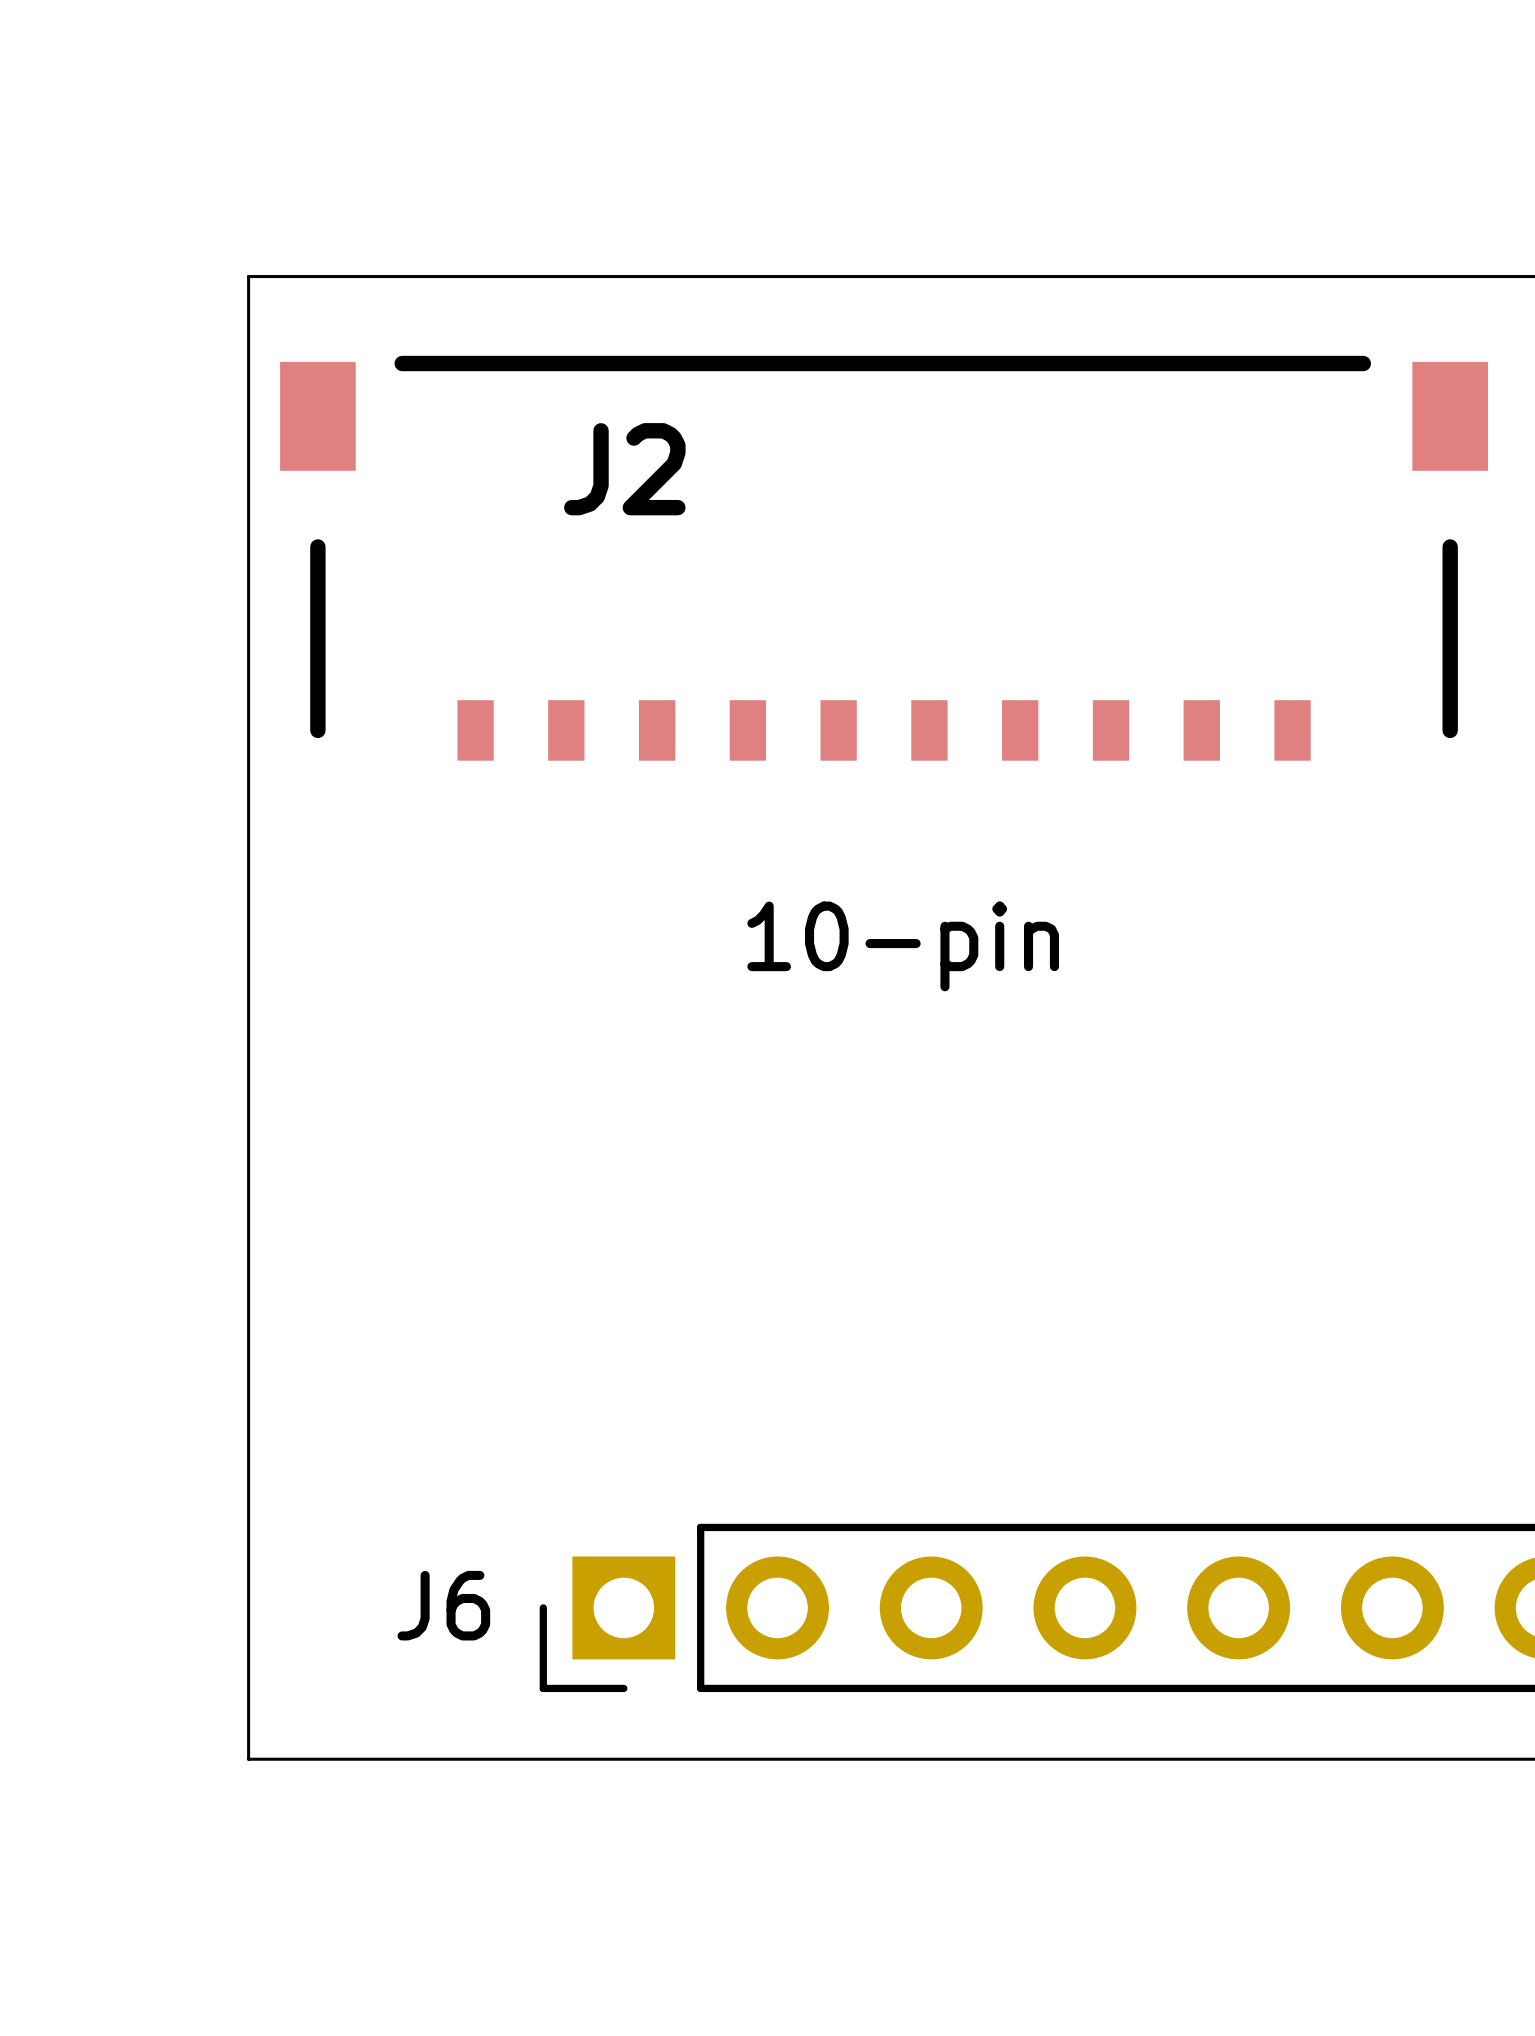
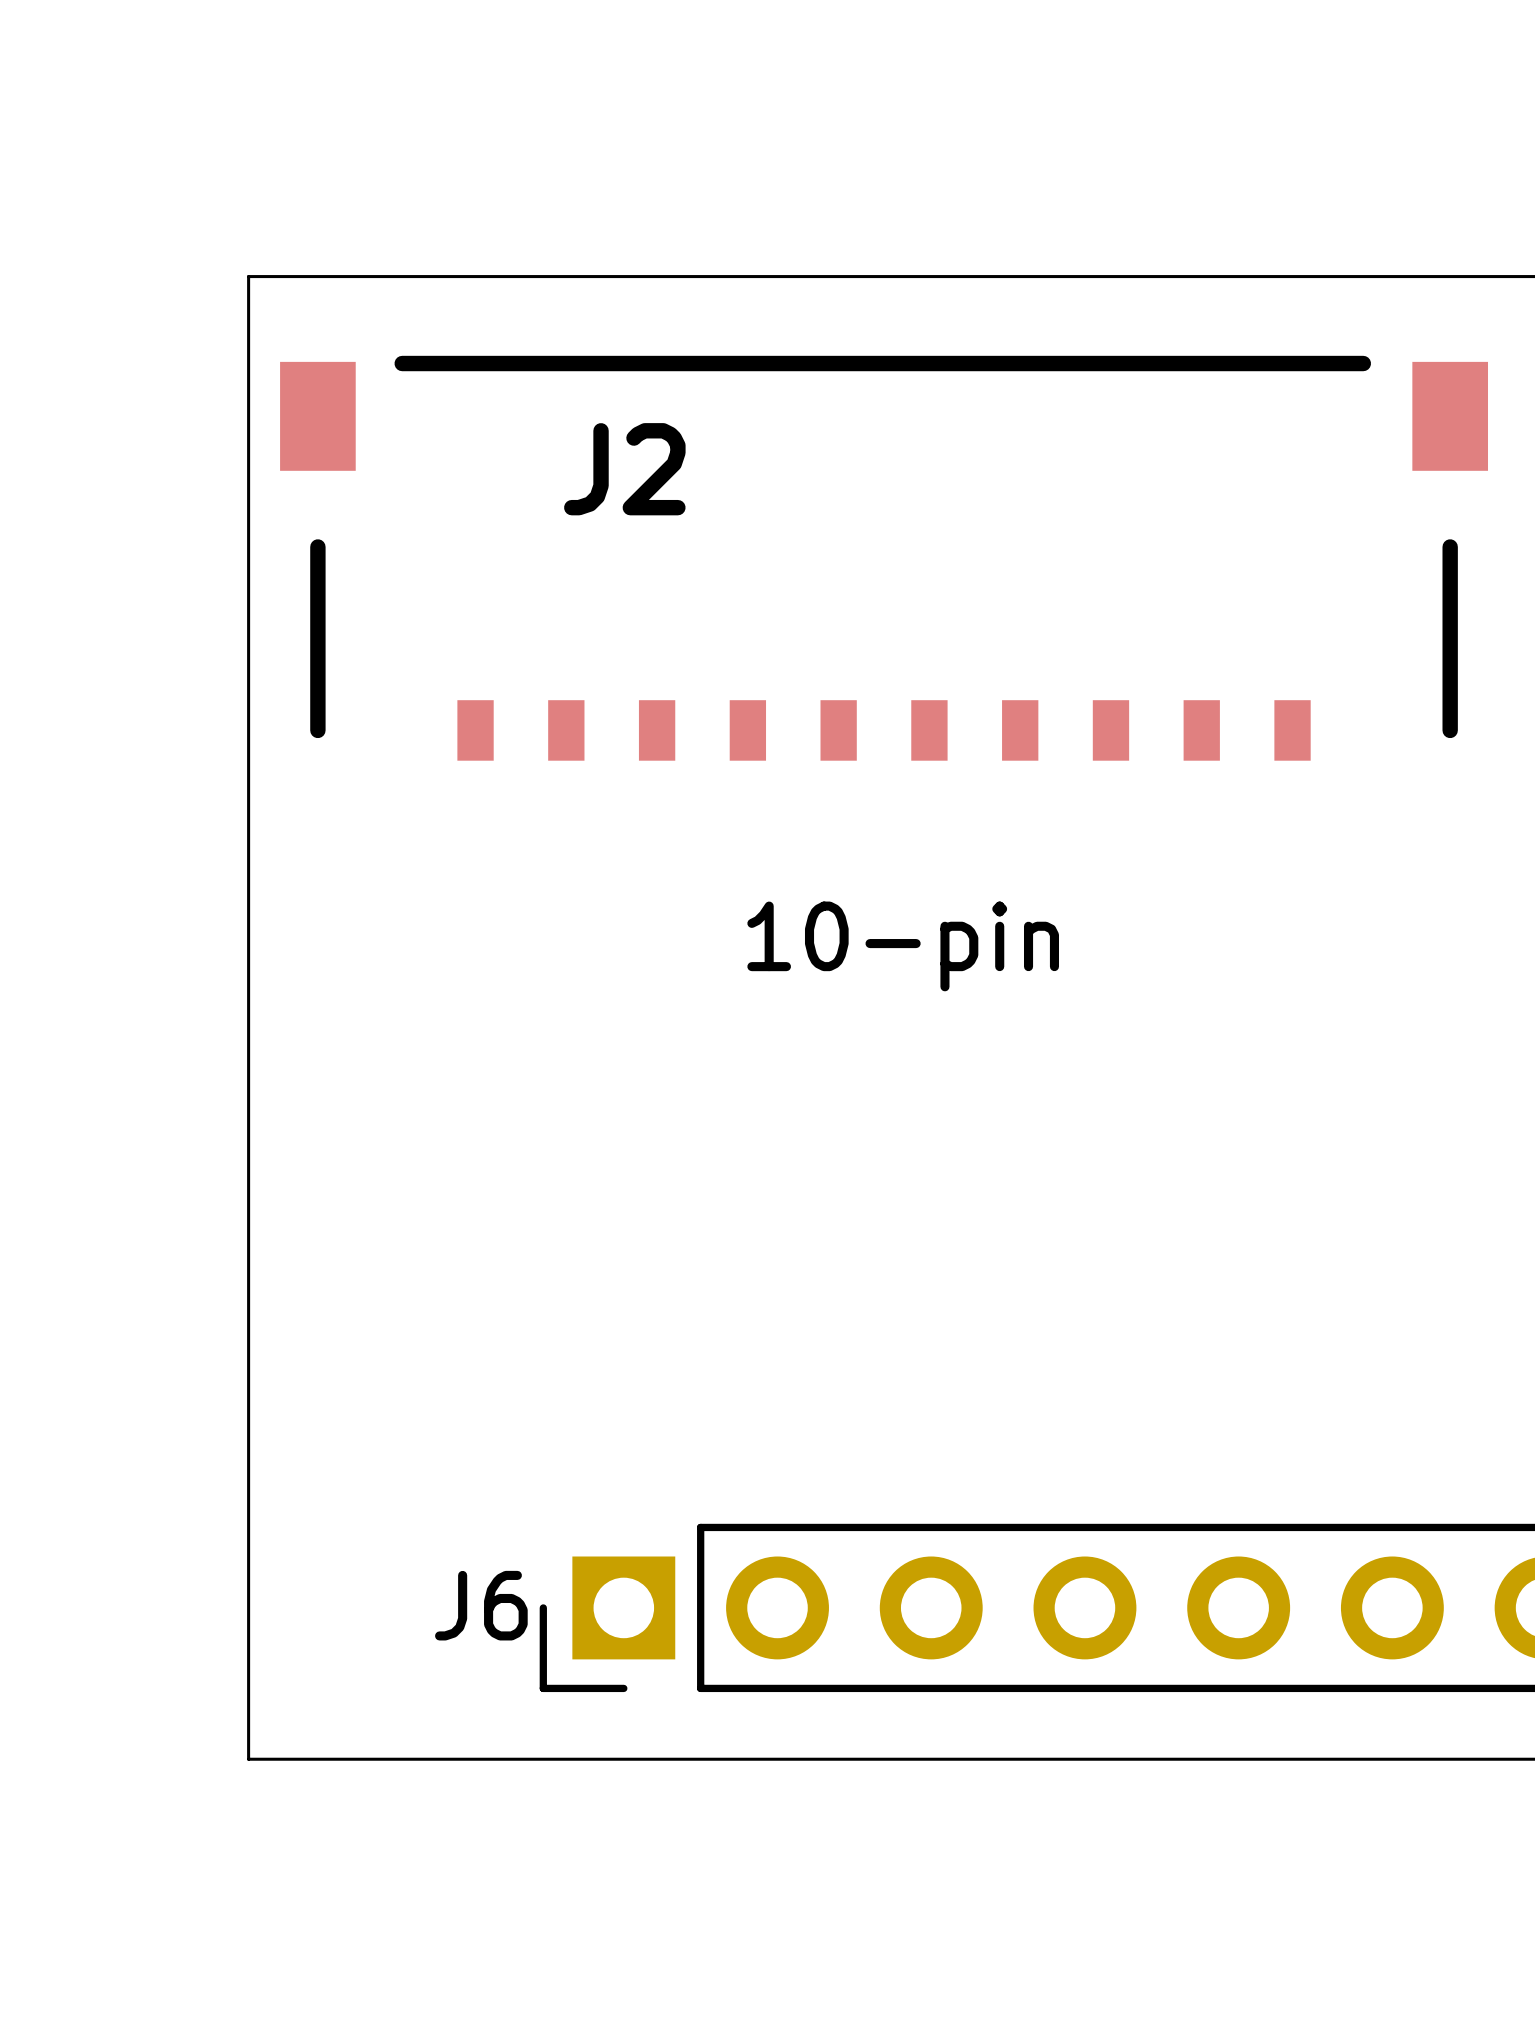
J6 name position: J6 (443, 1605) -> J6 (481, 1605)

